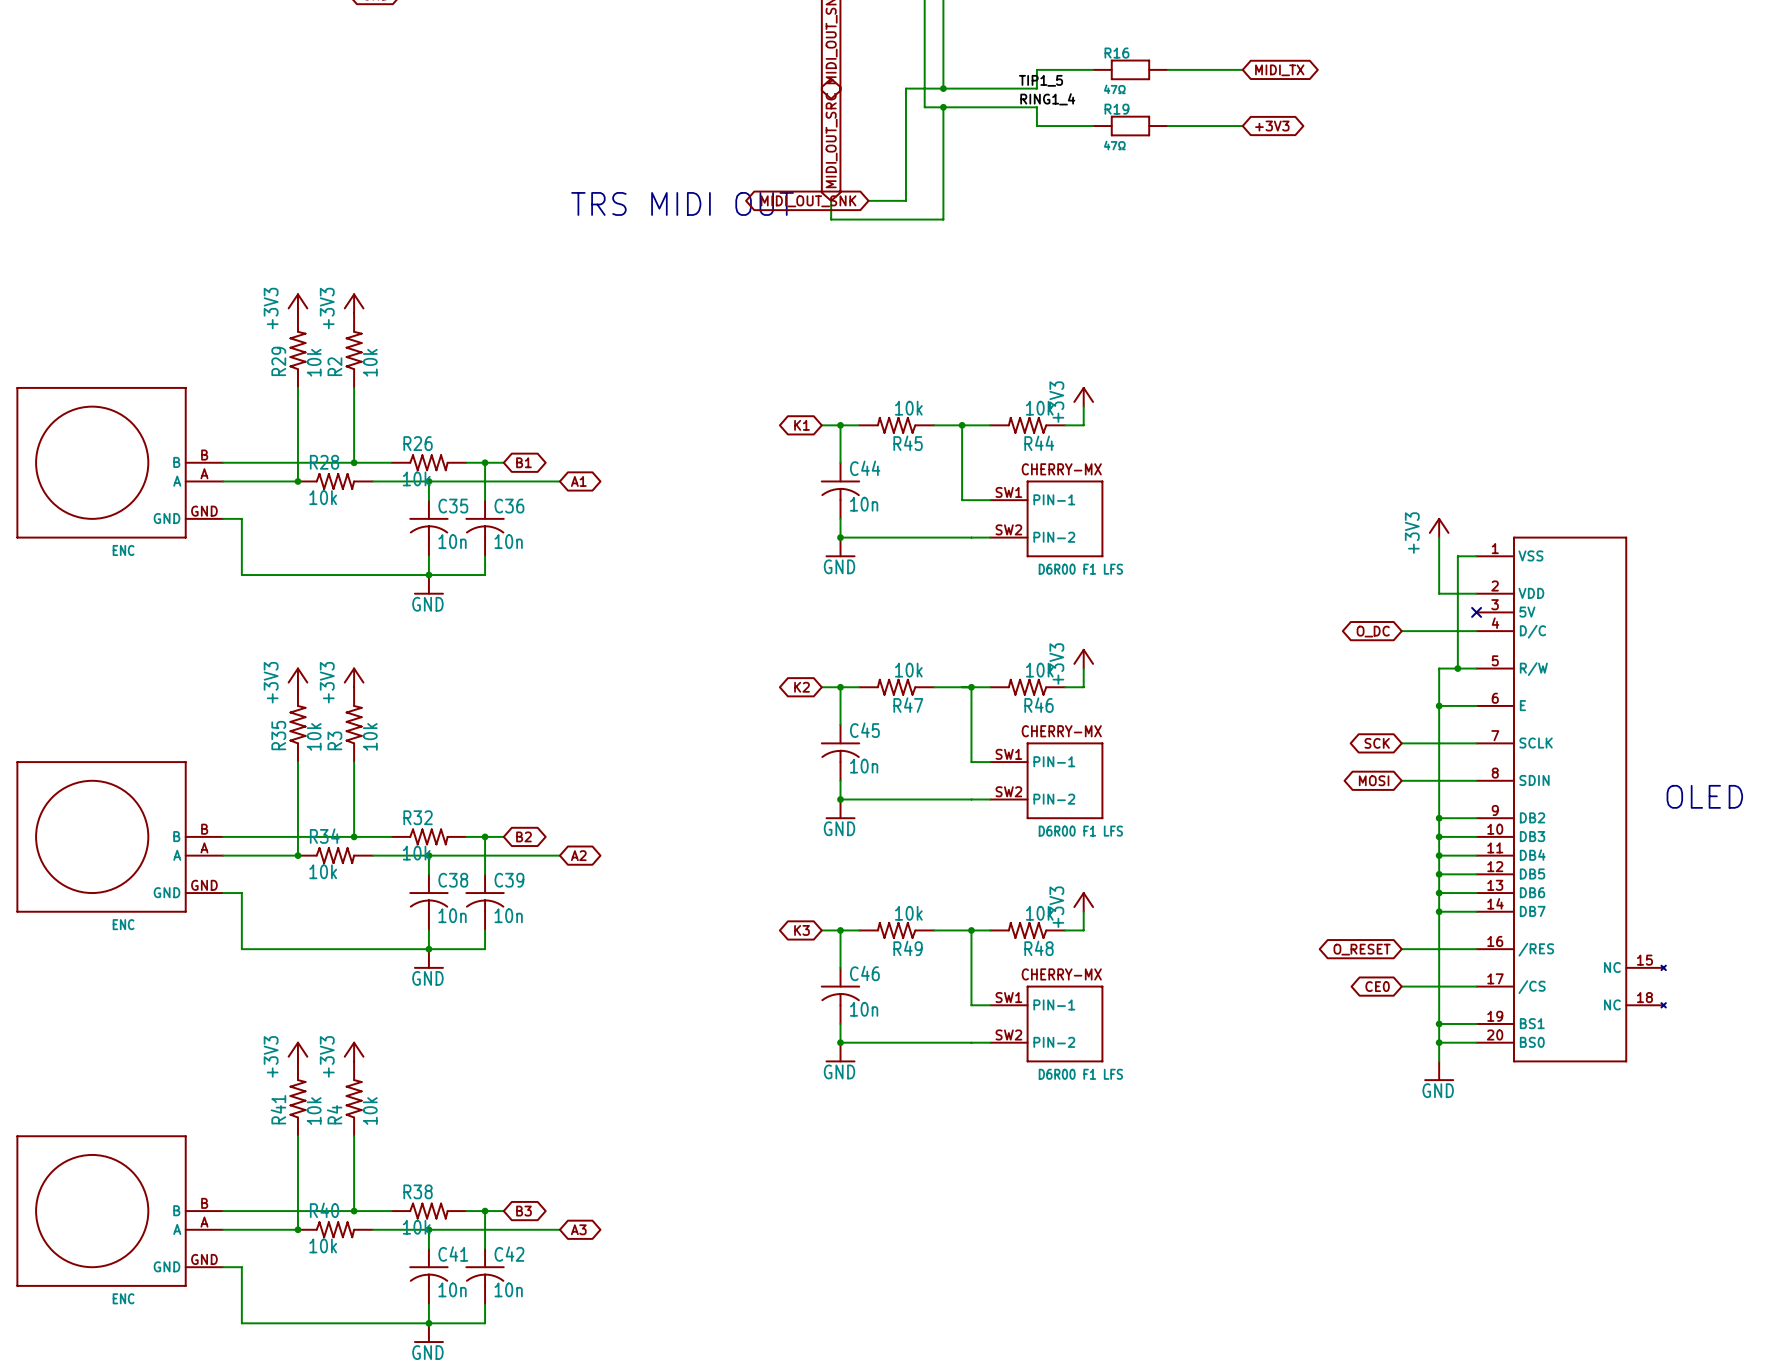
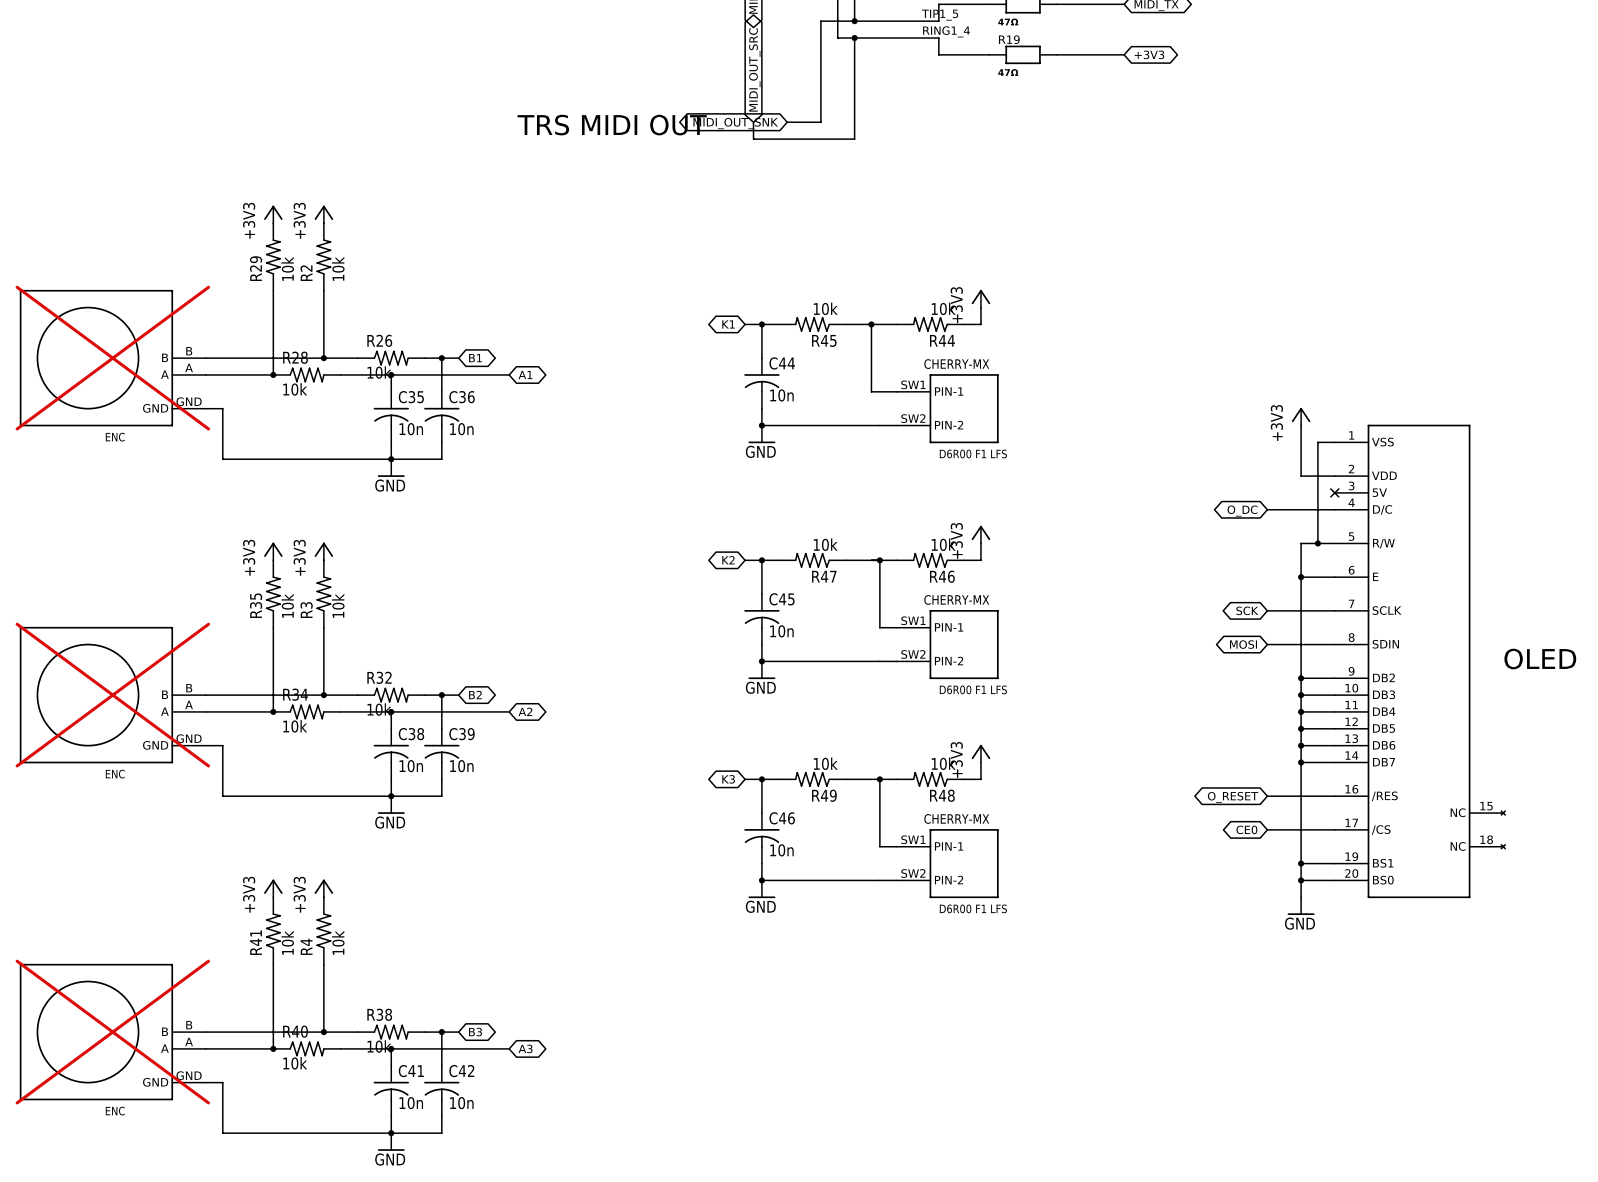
part do-not-place cross: none -> (112, 358)
part do-not-place cross: none -> (112, 695)
part do-not-place cross: none -> (112, 1032)

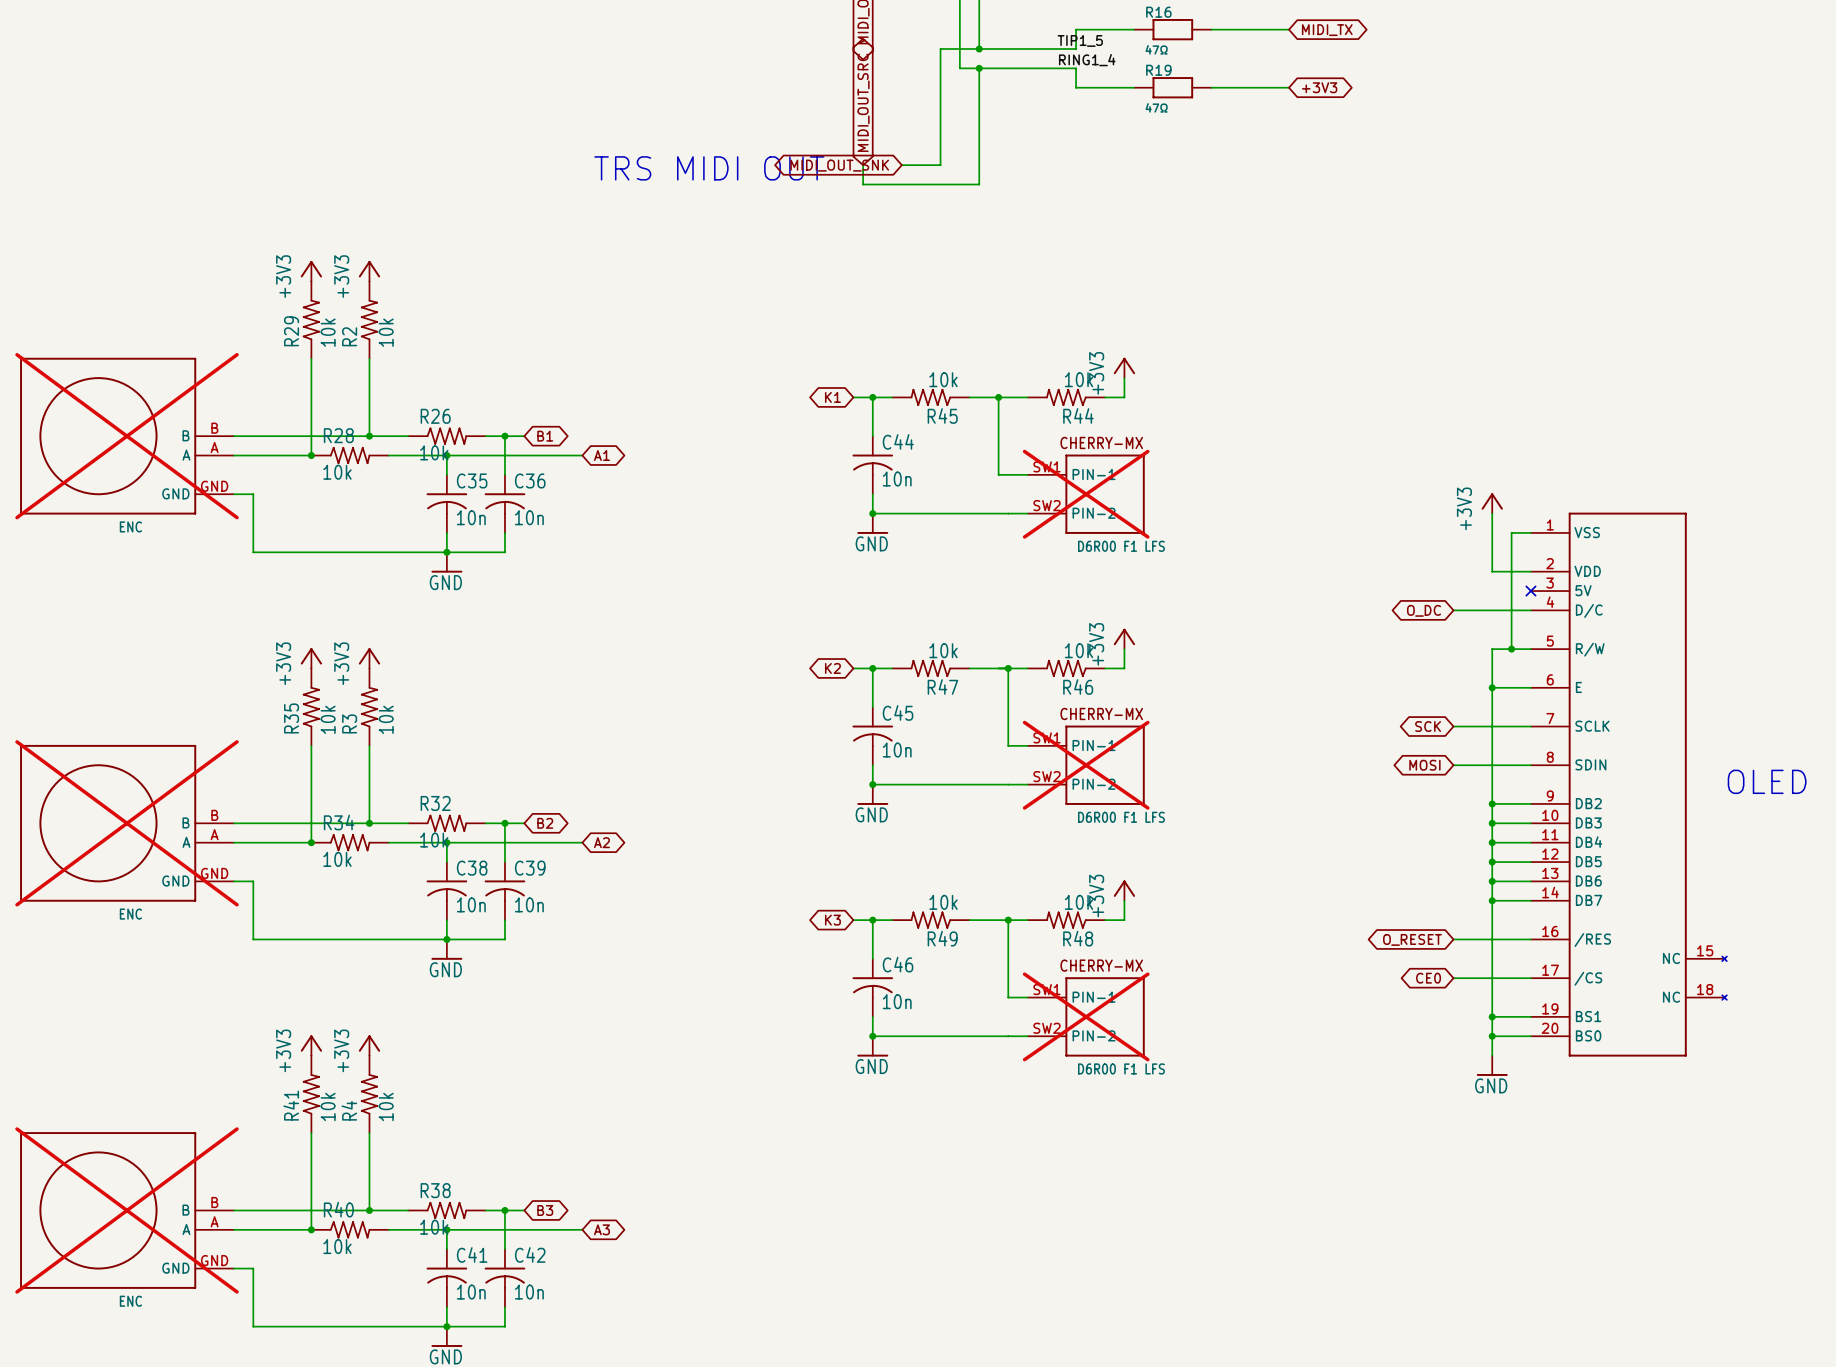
part do-not-place cross: none -> (1086, 494)
part do-not-place cross: none -> (1086, 765)
part do-not-place cross: none -> (1086, 1016)

